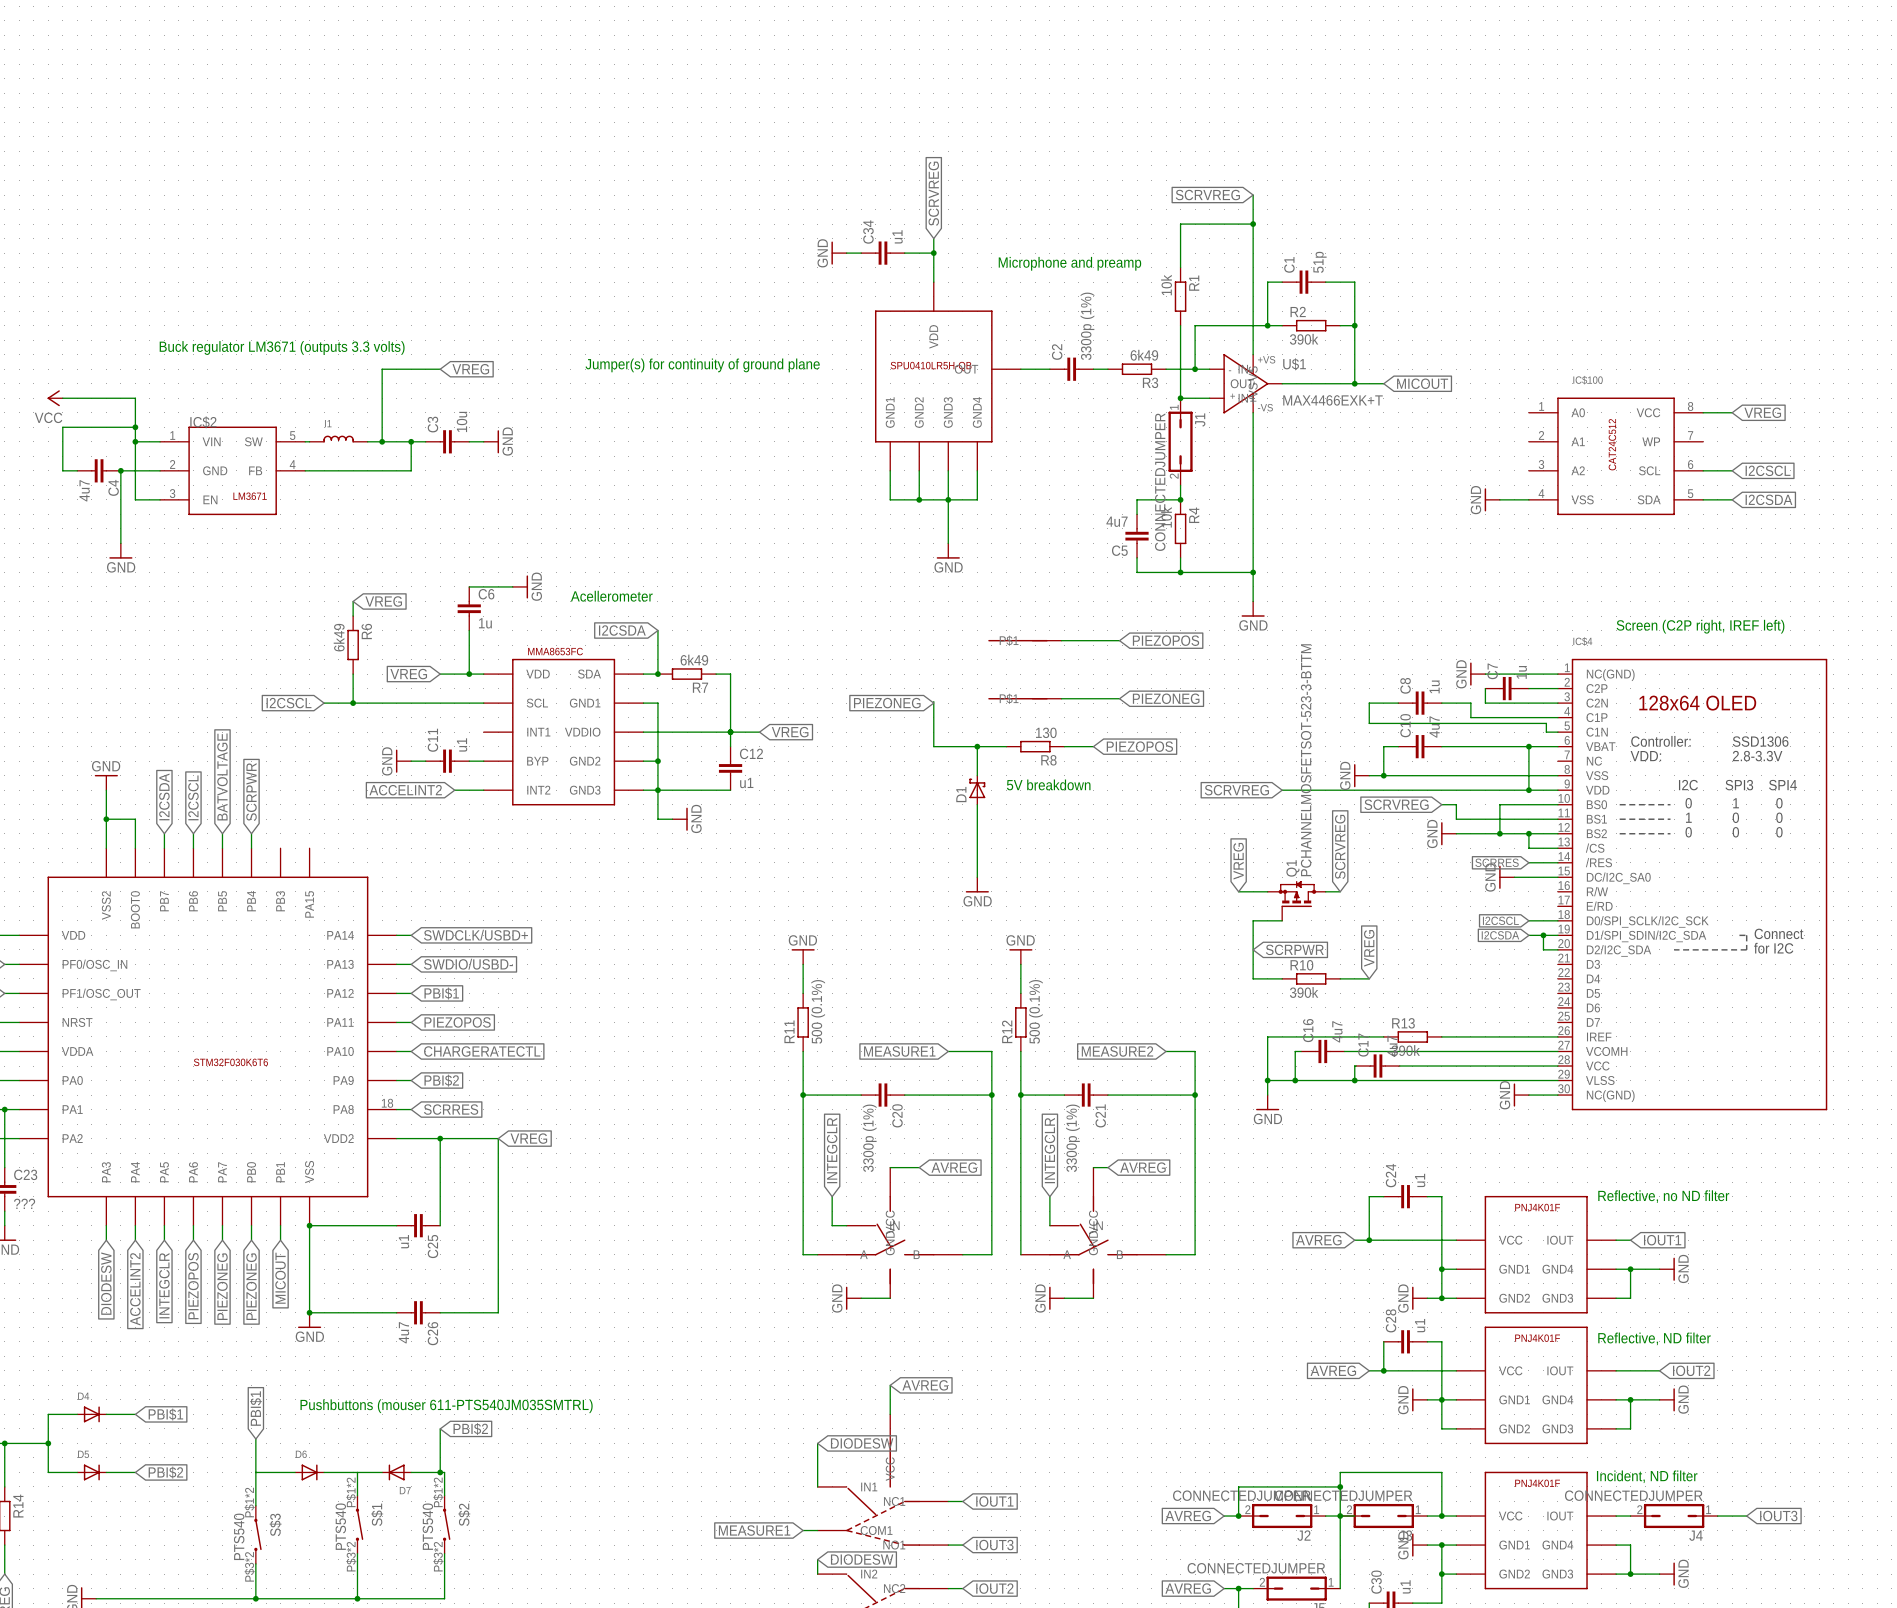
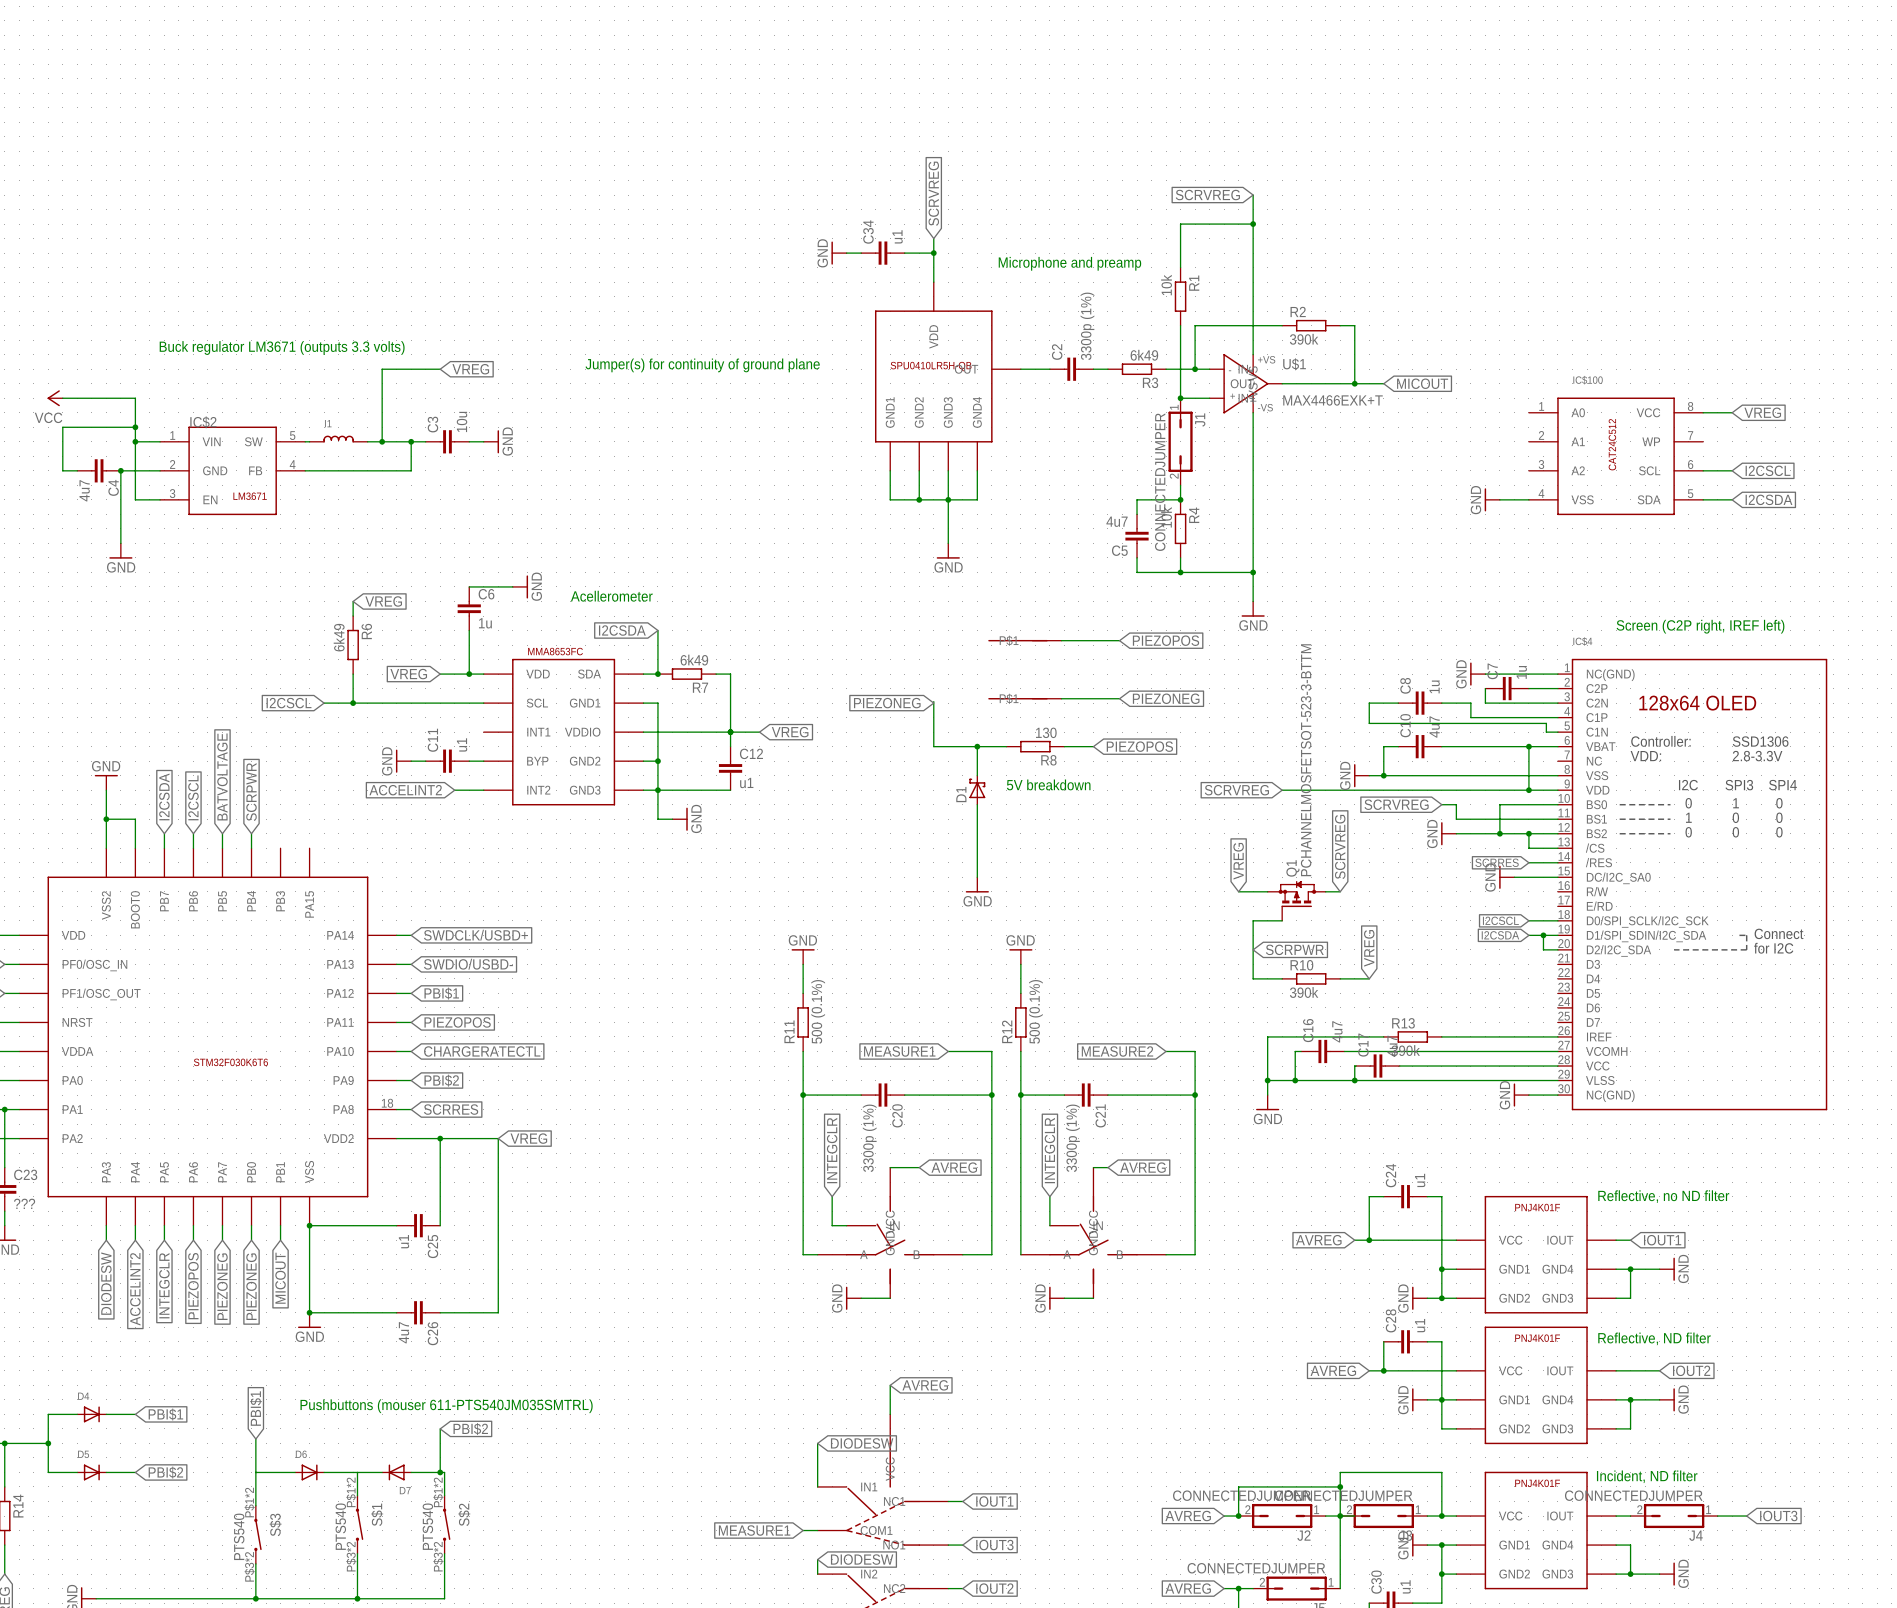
wire: (1282, 282) (1267, 282) (1267, 325) -> none
C1: 51p (1303, 282) -> none
wire: (1325, 282) (1354, 282) (1354, 325) -> none
junction: (1267, 325) -> none
junction: (1354, 325) -> none

